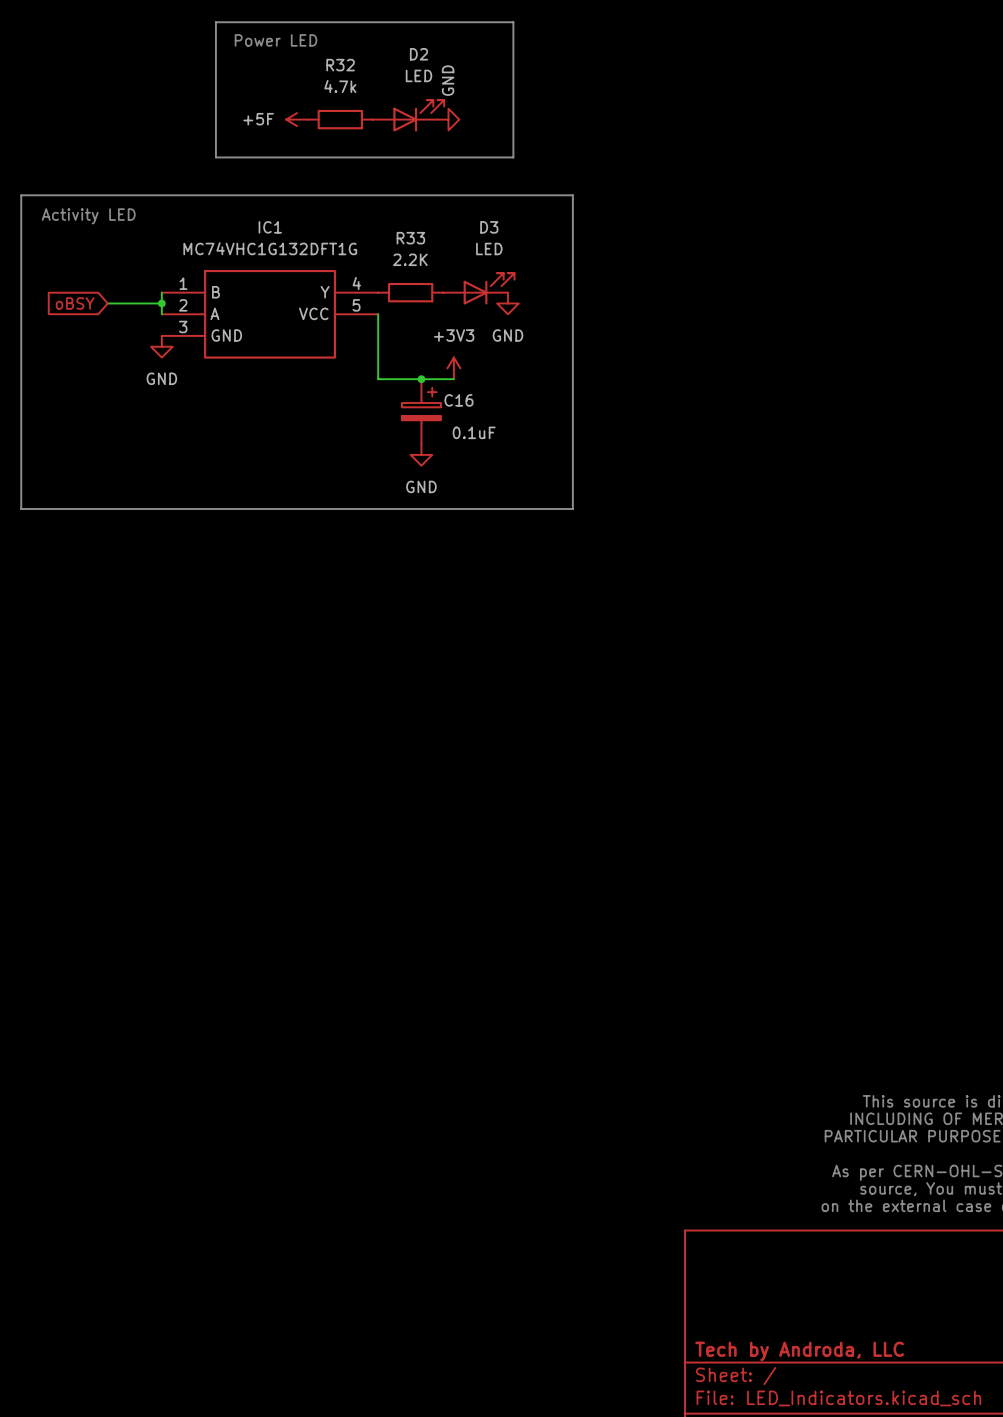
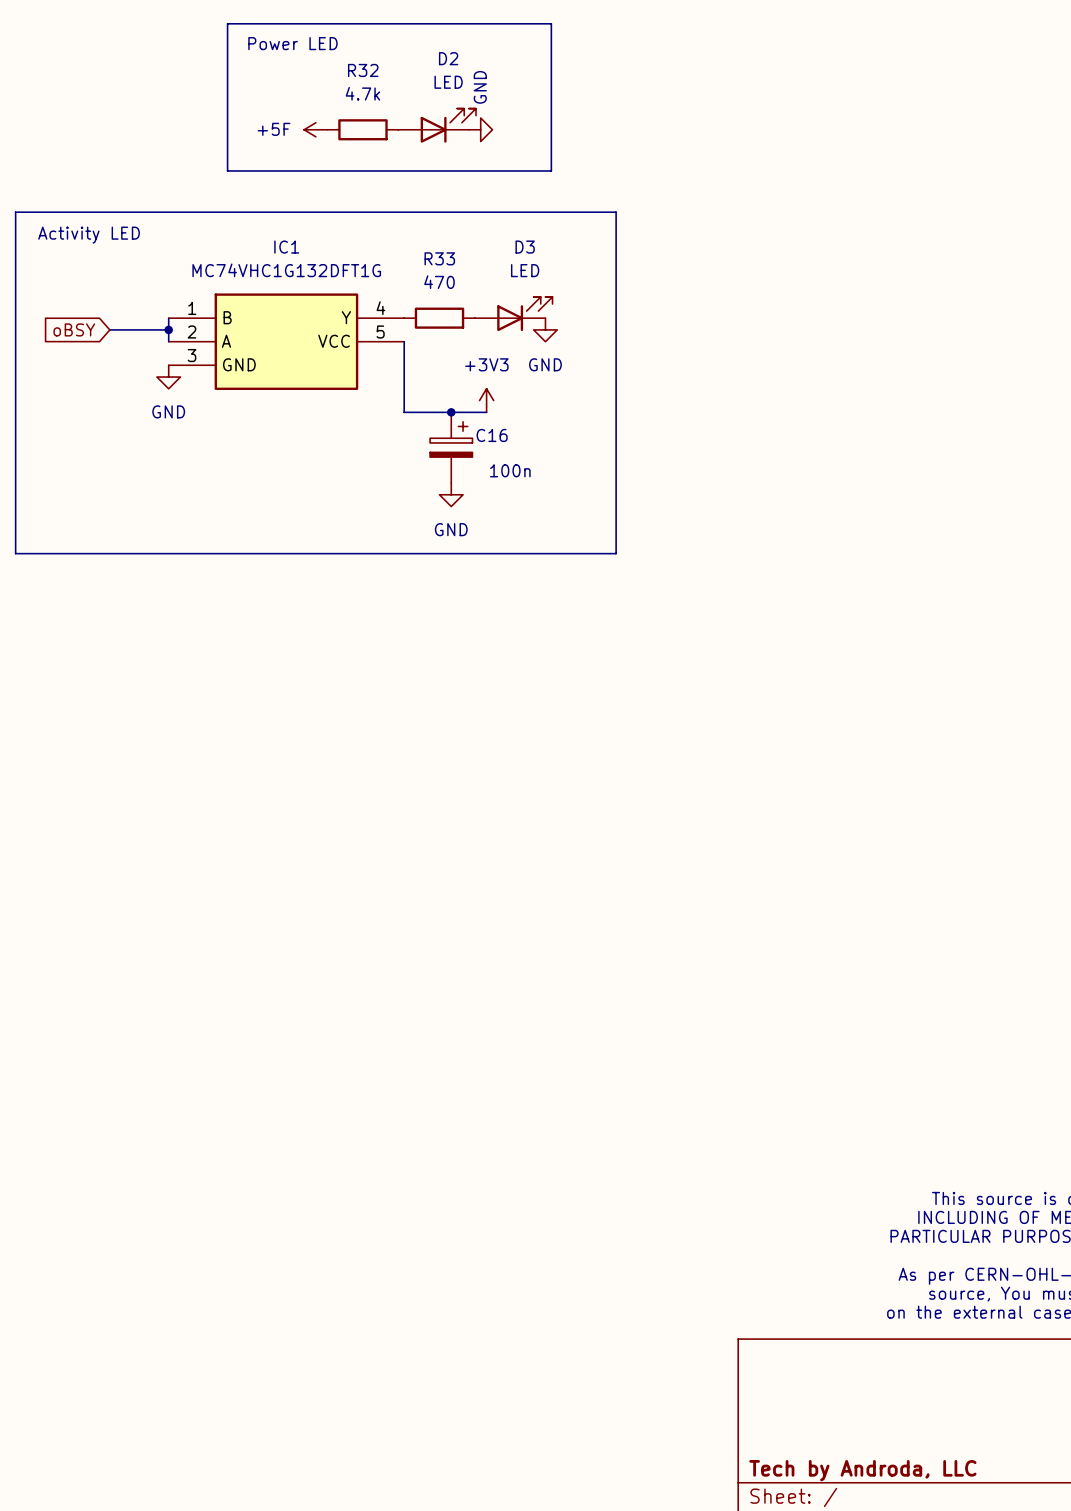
R33 value: 2.2K (410, 259) -> 470 (439, 282)
C16 value: 0.1uF (474, 432) -> 100n (510, 470)

